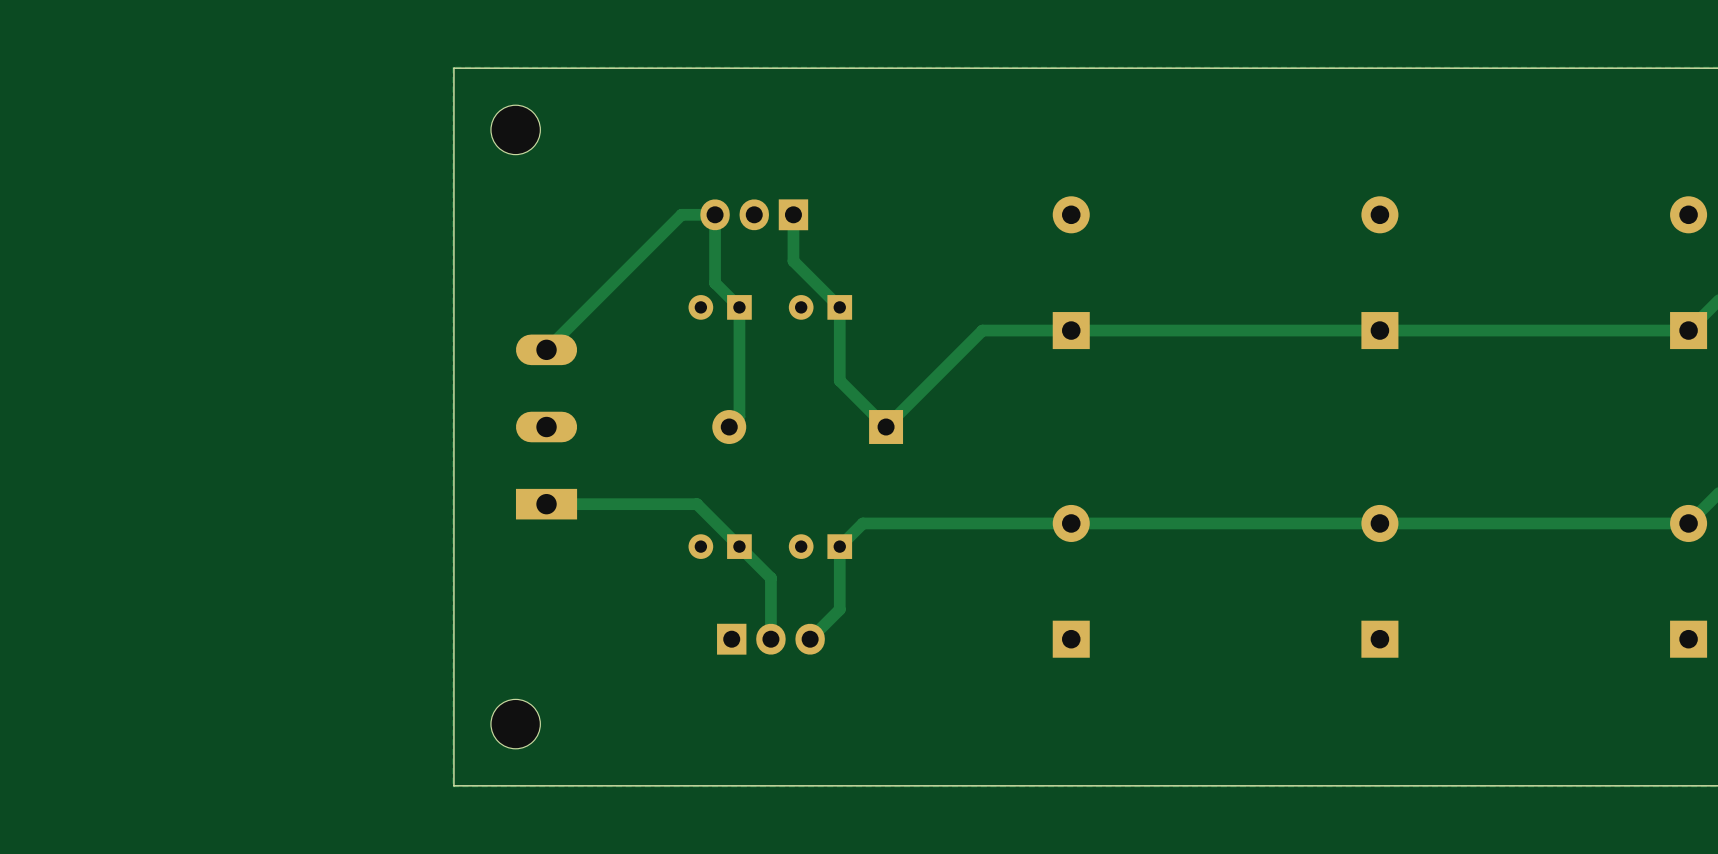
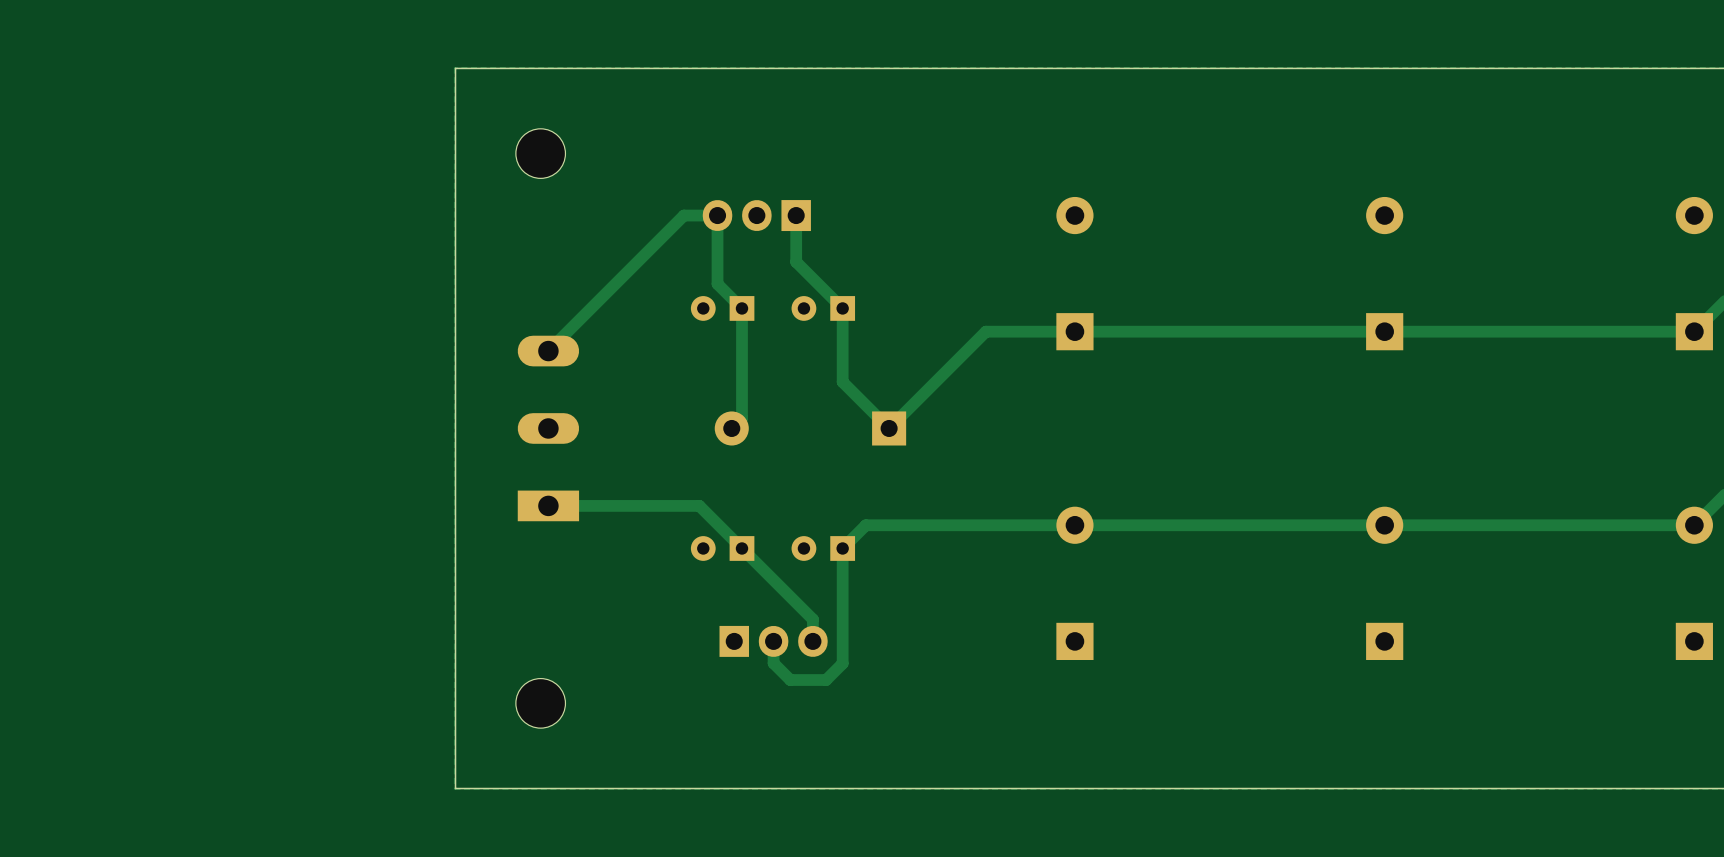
part position: (515, 129) -> (540, 153)
track: (770, 578) (770, 639) -> (773, 580) (812, 619) (812, 641)
track: (839, 609) (810, 639) -> (842, 611) (842, 663) (826, 680) (790, 680) (773, 663) (773, 641)
part position: (515, 724) -> (540, 703)

